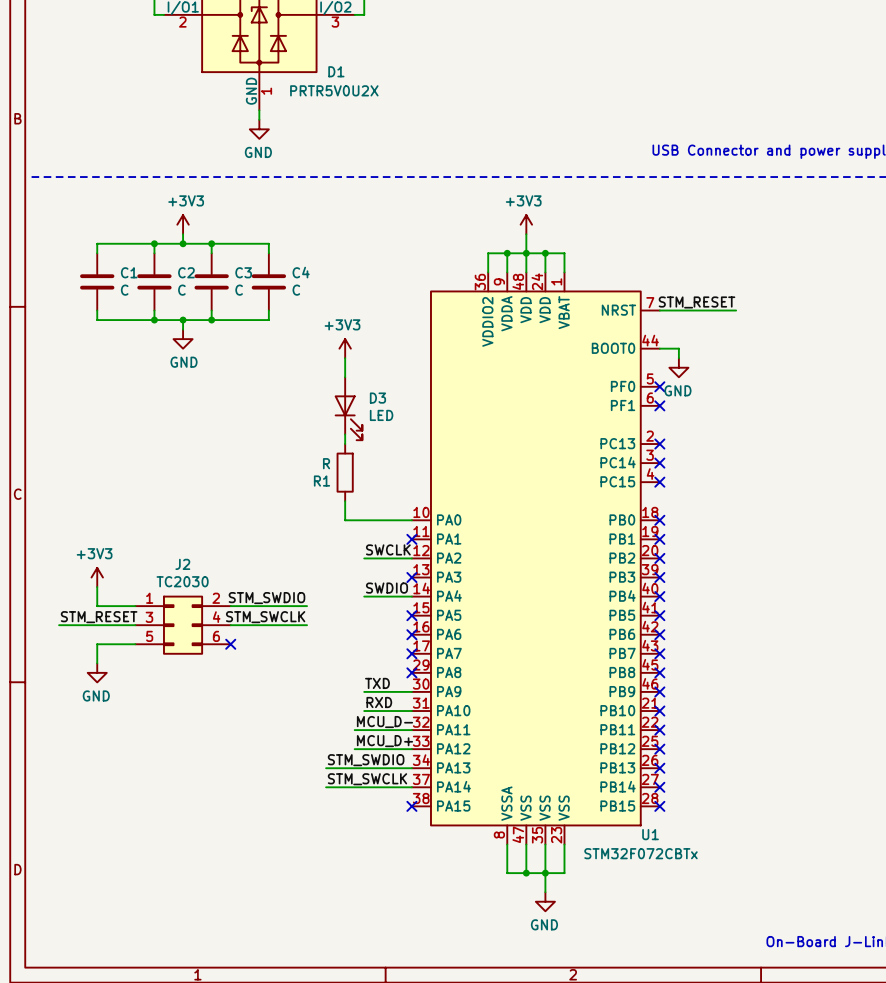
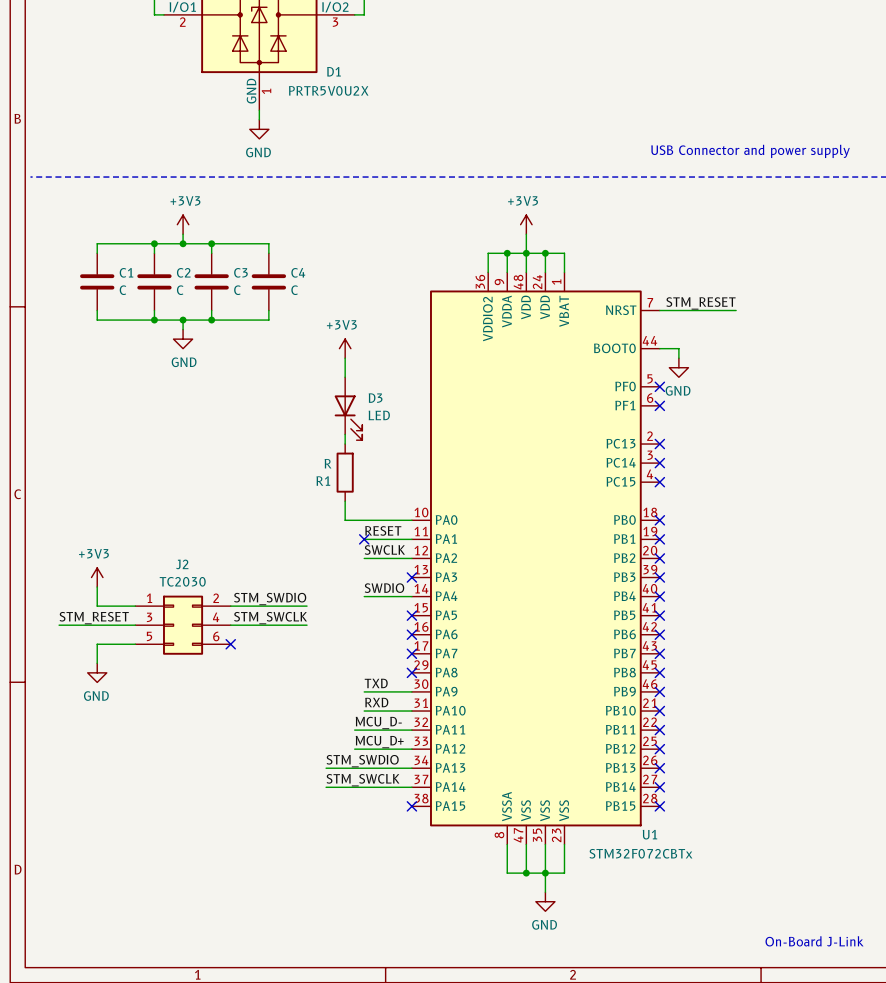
label: none -> RESET (383, 530)
wire: none -> (364, 539) (411, 539)
no-connect mark: none -> (364, 539)
no-connect mark: (411, 539) -> none

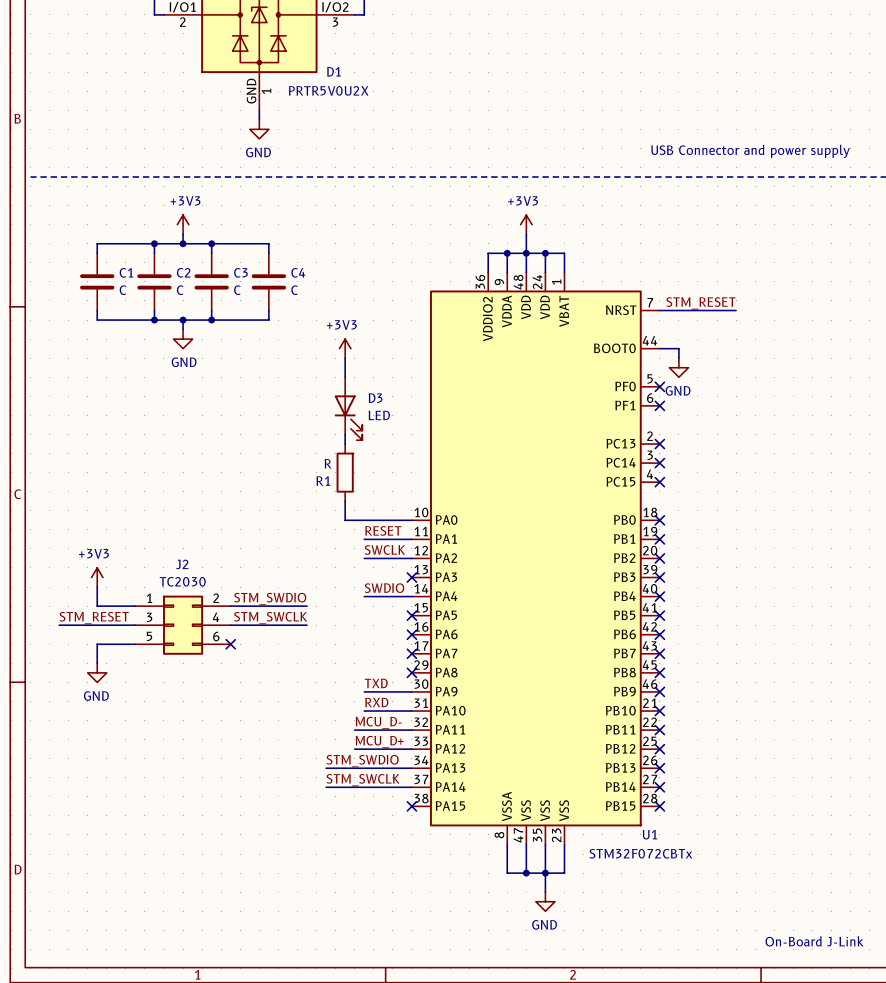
no-connect mark: (364, 539) -> none

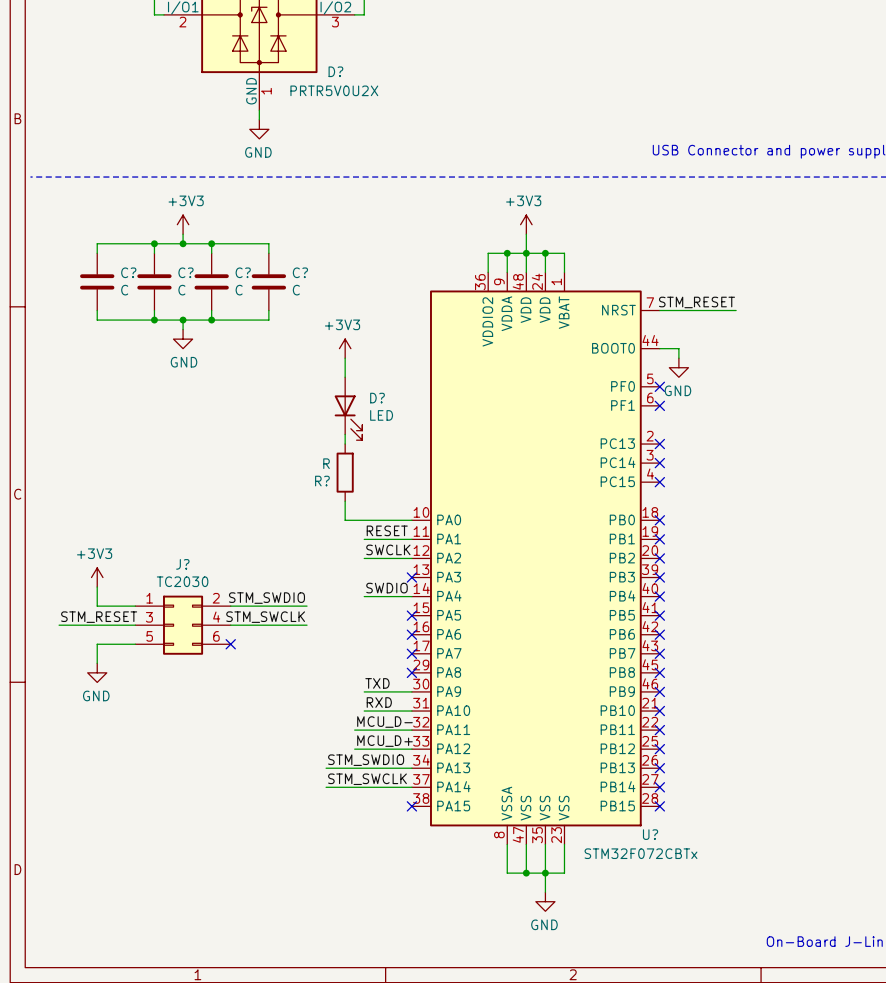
D1 name: D1 (333, 71) -> D? (335, 71)
C1 name: C1 (126, 272) -> C? (128, 272)
C2 name: C2 (183, 272) -> C? (185, 272)
C3 name: C3 (240, 272) -> C? (243, 272)
C4 name: C4 (298, 272) -> C? (300, 272)
D3 name: D3 (375, 398) -> D? (377, 398)
R1 name: R1 (323, 481) -> R? (322, 481)
J2 name: J2 (182, 564) -> J? (182, 564)
U1 name: U1 (649, 834) -> U? (650, 834)

